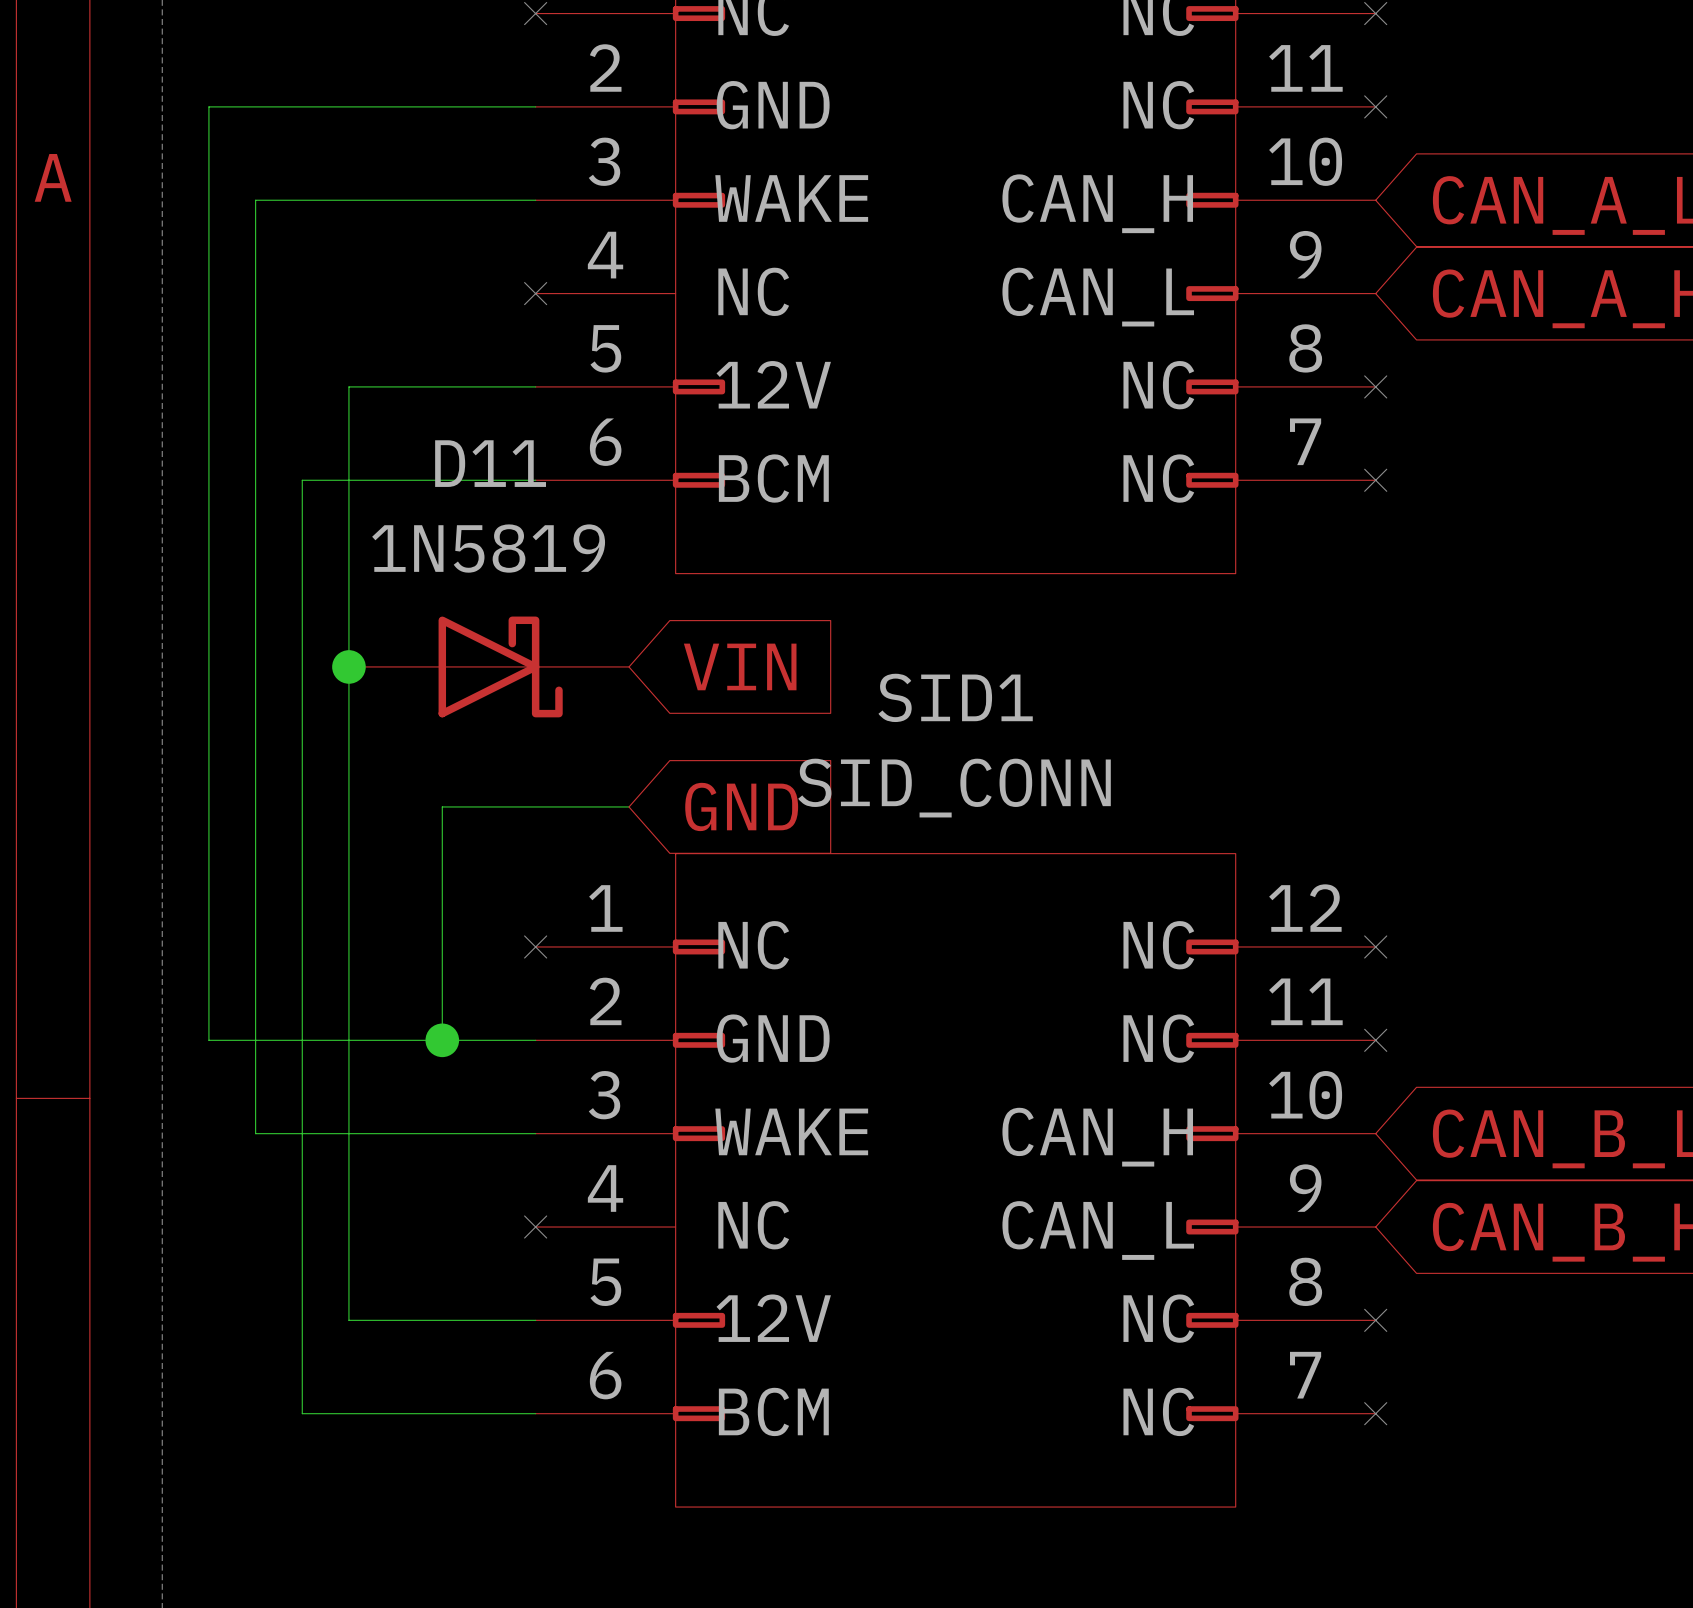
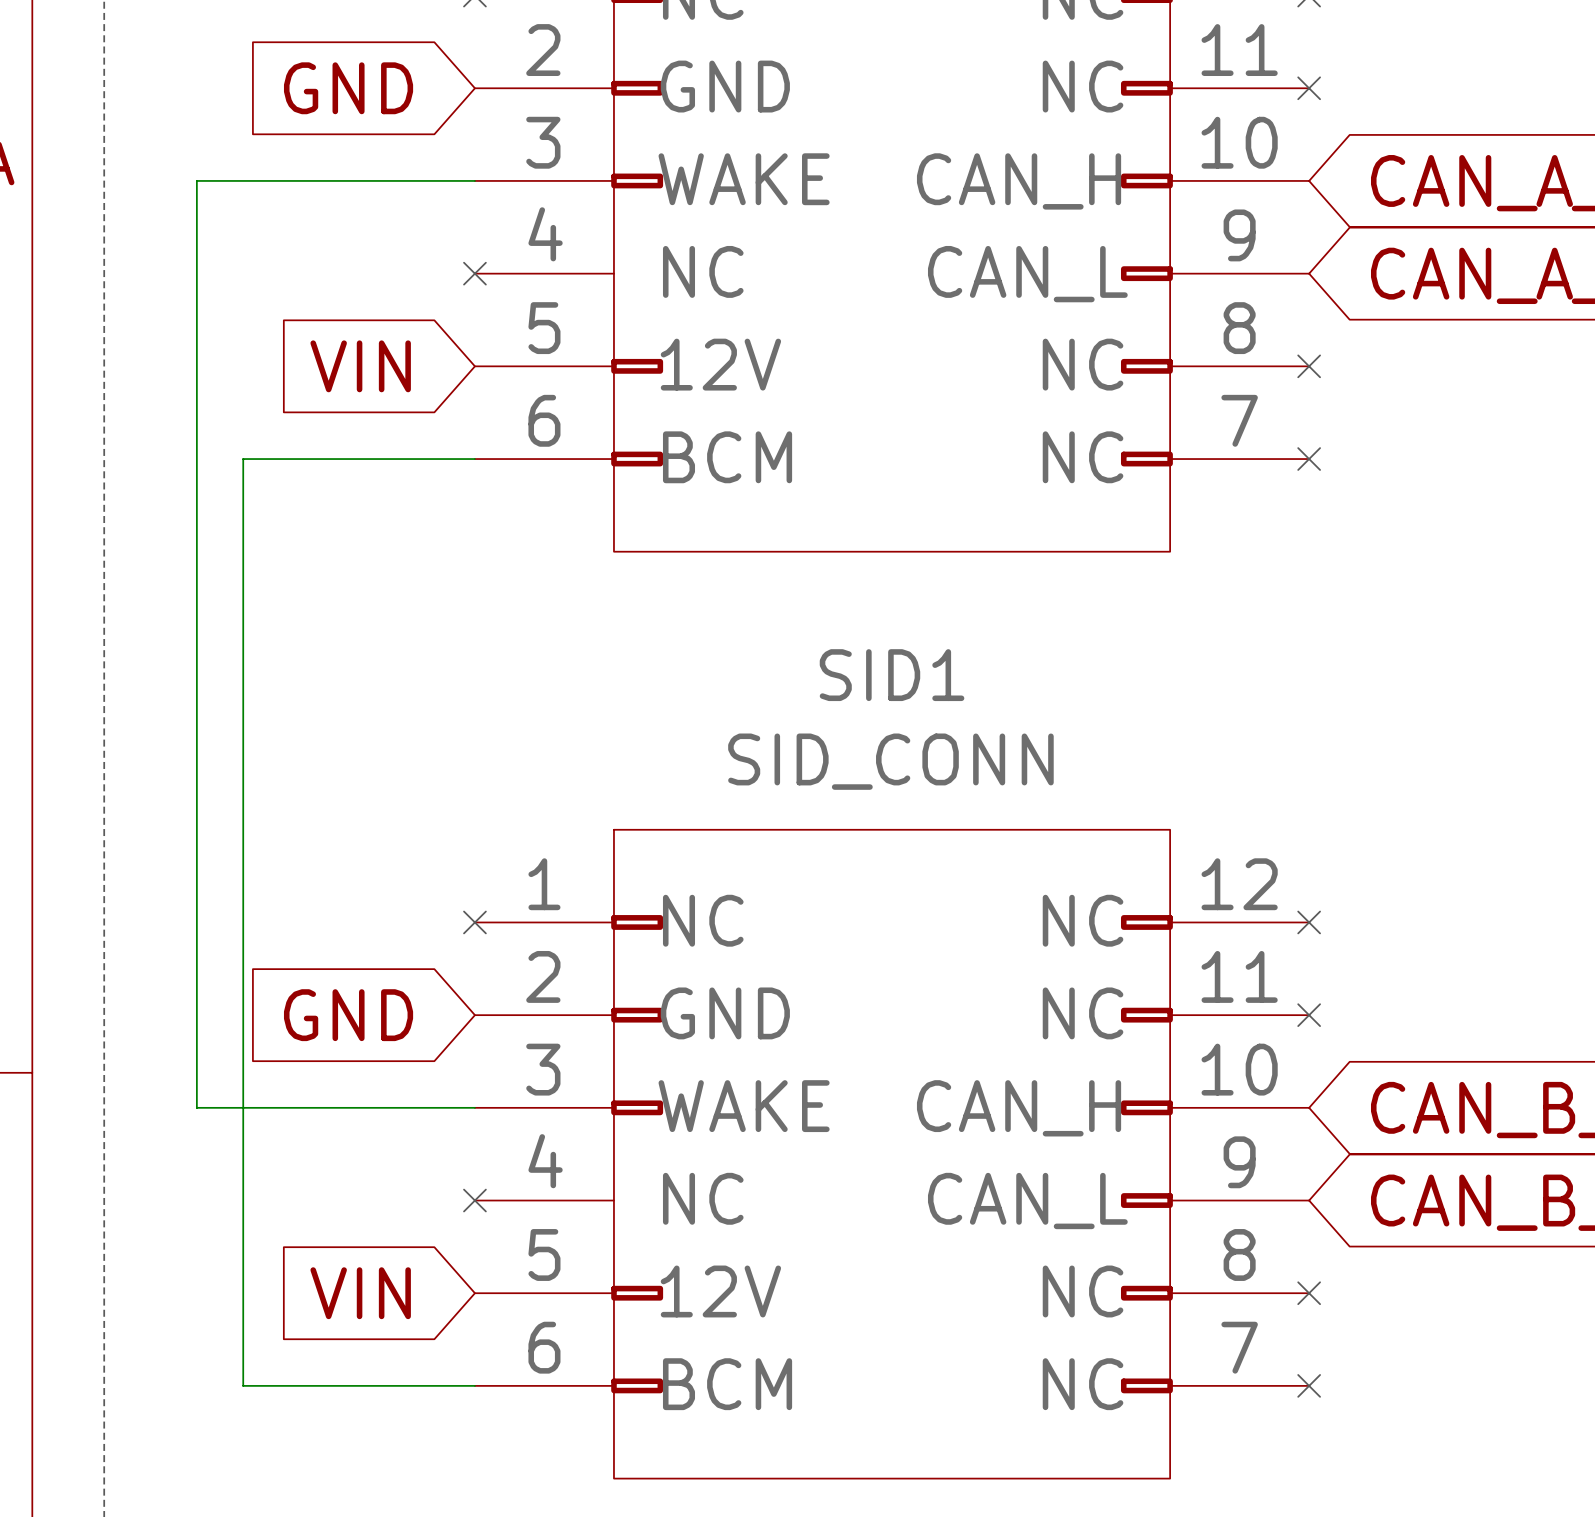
global label: none -> GND (348, 88)
wire: (535, 106) (208, 106) (208, 1040) (535, 1040) -> none
wire: (535, 386) (348, 386) (348, 1320) (535, 1320) -> none
junction: (348, 666) -> none
D11: 1N5819 (488, 666) -> none
global label rotation: 0° (740, 666) -> 180° (360, 366)
global label position: VIN (740, 666) -> VIN (360, 366)
wire: (628, 806) (442, 806) (442, 1040) -> none
global label rotation: 0° (741, 806) -> 180° (348, 1015)
global label position: GND (741, 806) -> GND (348, 1015)
junction: (442, 1040) -> none
global label: none -> VIN (360, 1293)

